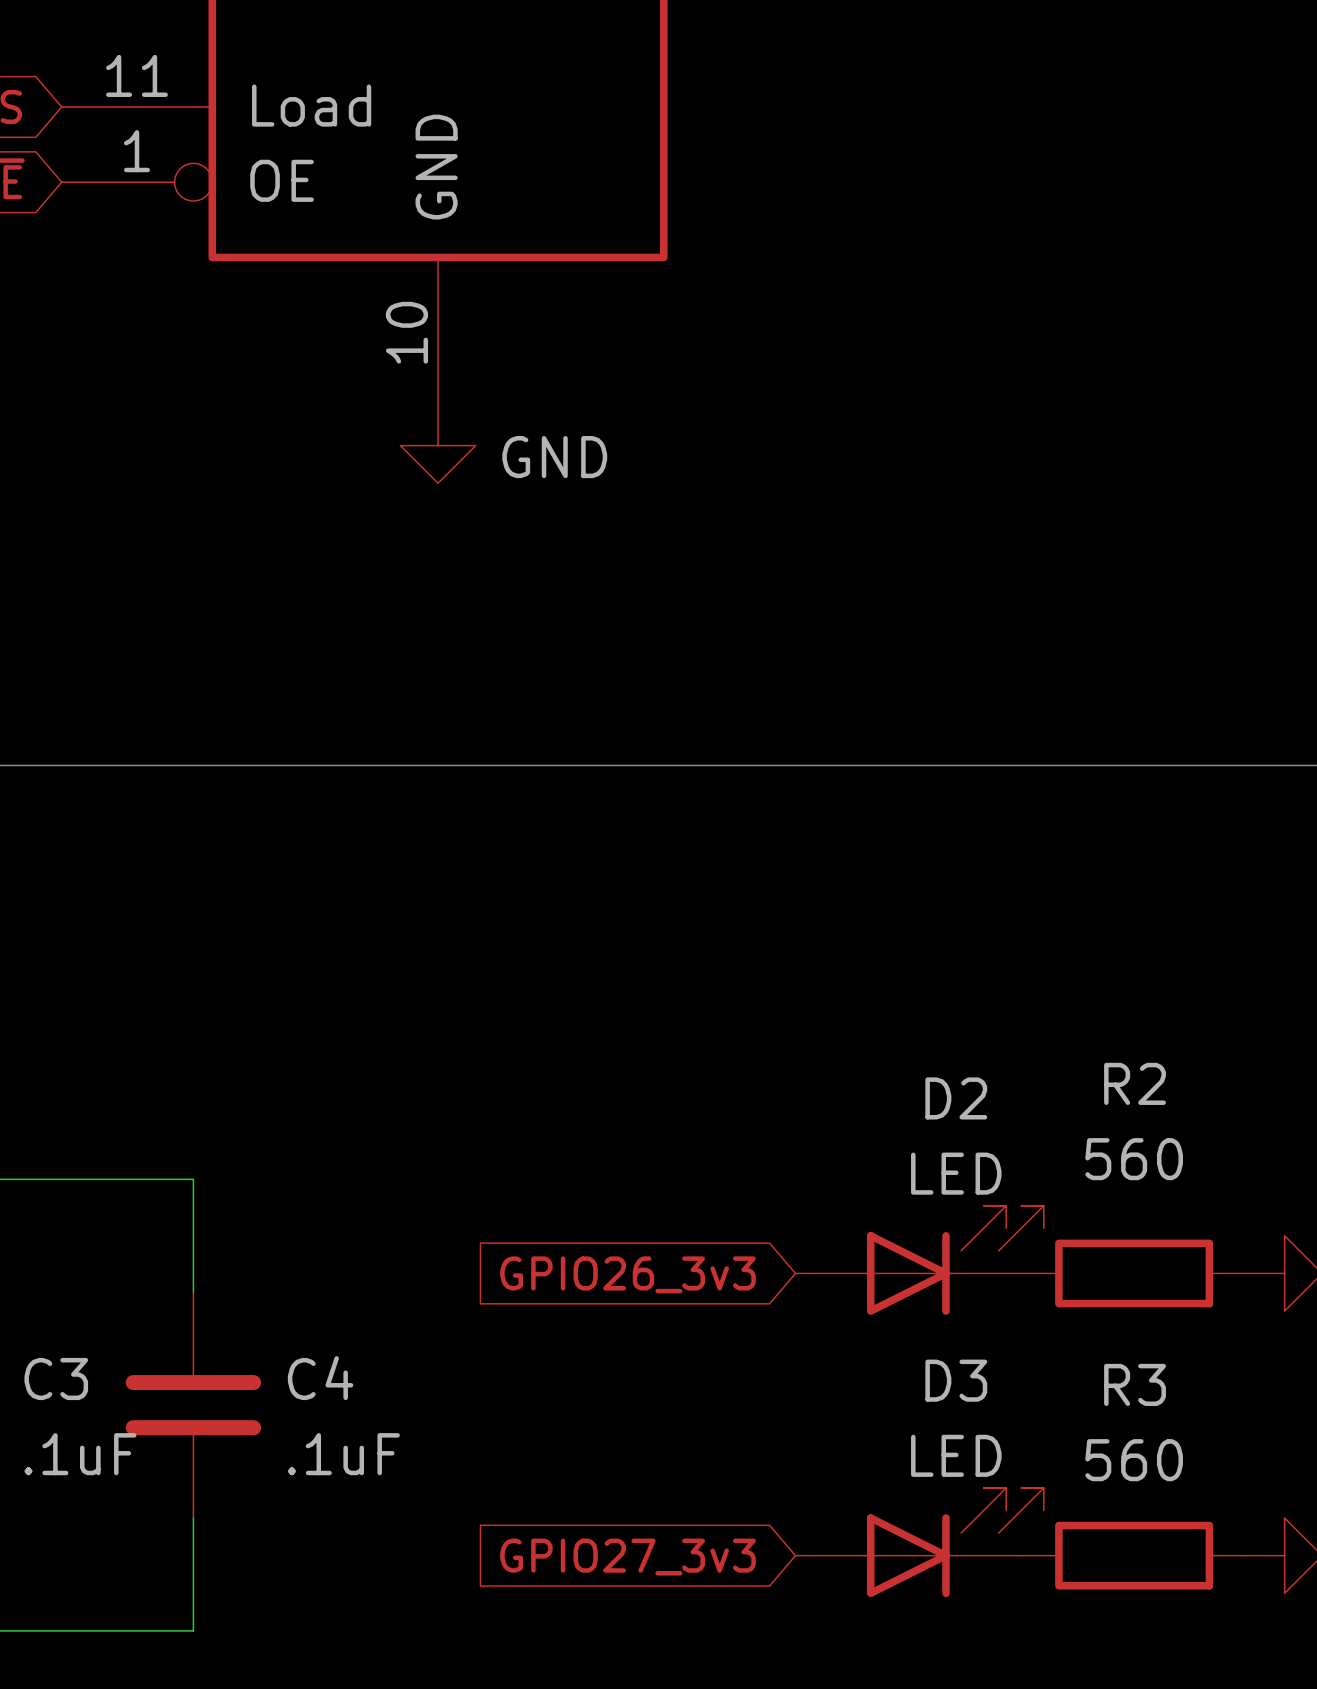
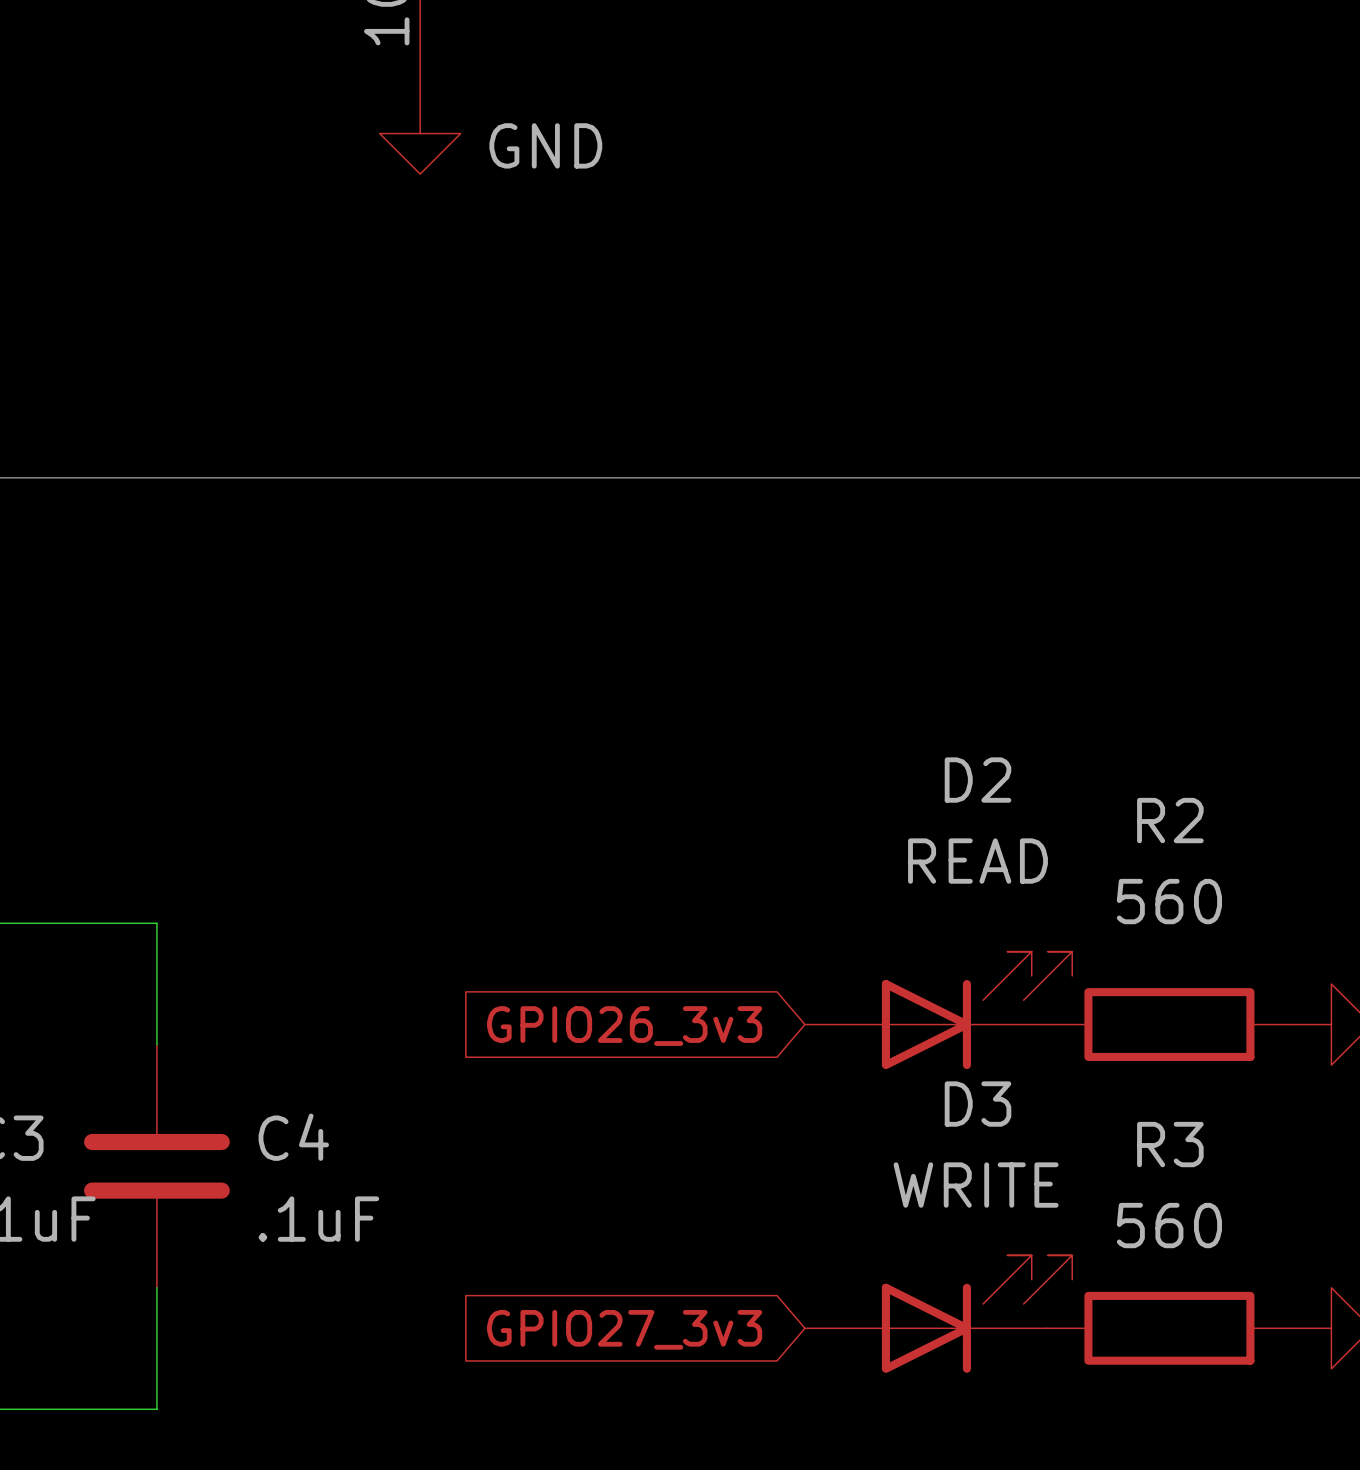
D2 name position: D2 (956, 1098) -> D2 (978, 780)
D2 value: LED (956, 1173) -> READ (978, 861)
D3 name position: D3 (956, 1380) -> D3 (978, 1104)
D3 value: LED (956, 1455) -> WRITE (976, 1185)

